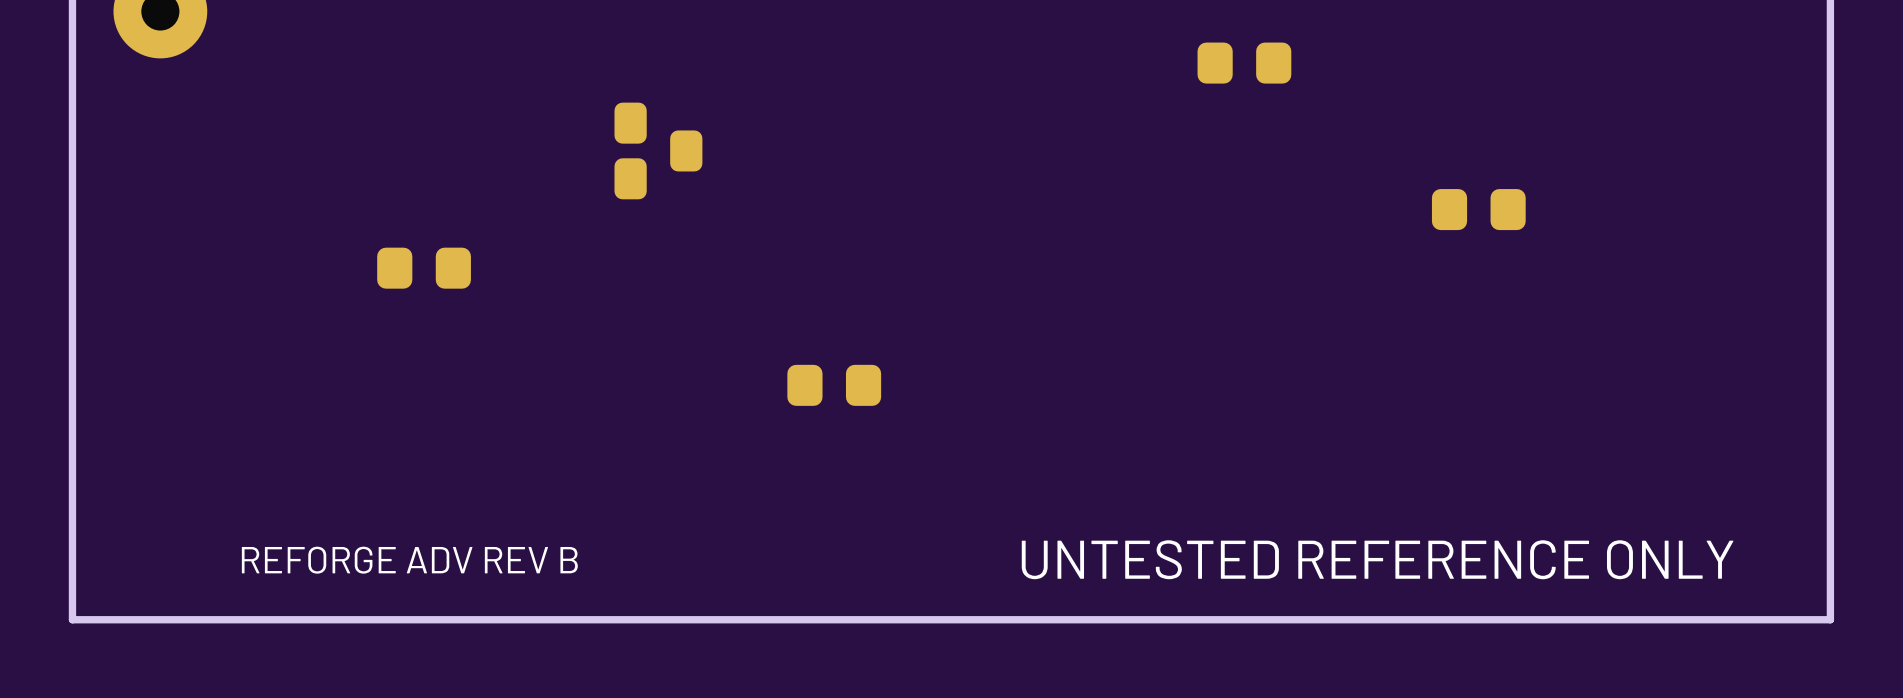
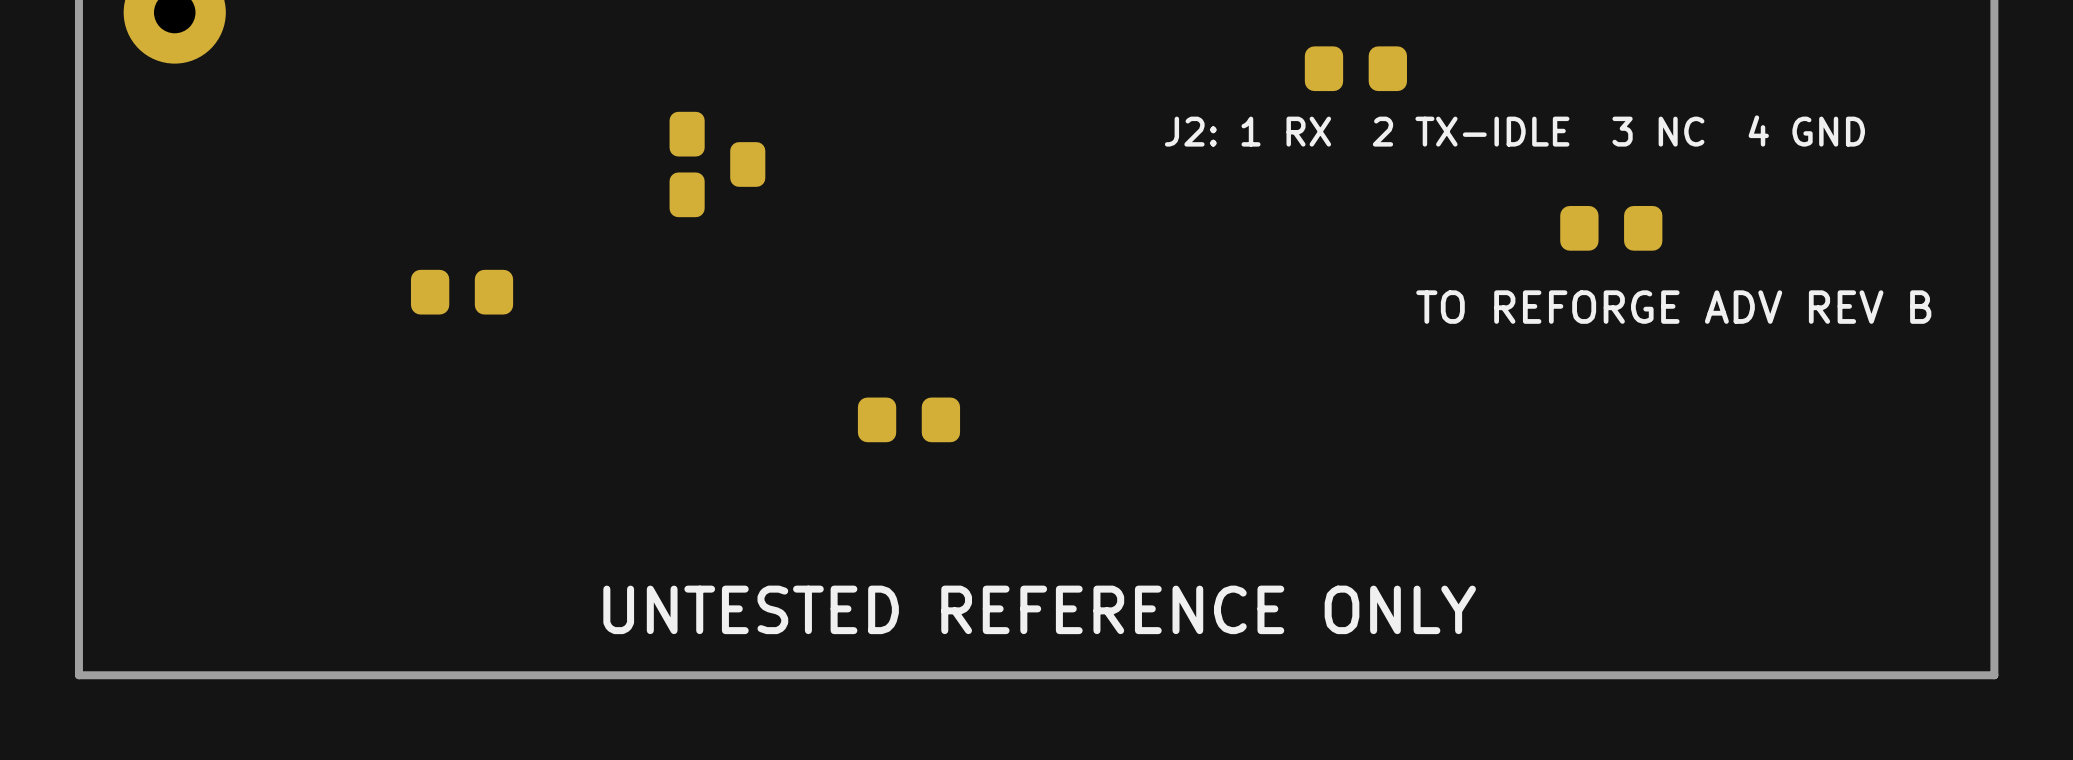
text: none -> J2: 1 RX 2 TX-IDLE 3 NC 4 GND (1514, 131)
text: none -> TO REFORGE ADV REV B (1673, 307)
text position: UNTESTED REFERENCE ONLY (1377, 559) -> UNTESTED REFERENCE ONLY (1039, 609)
text: REFORGE ADV REV B (409, 560) -> none

